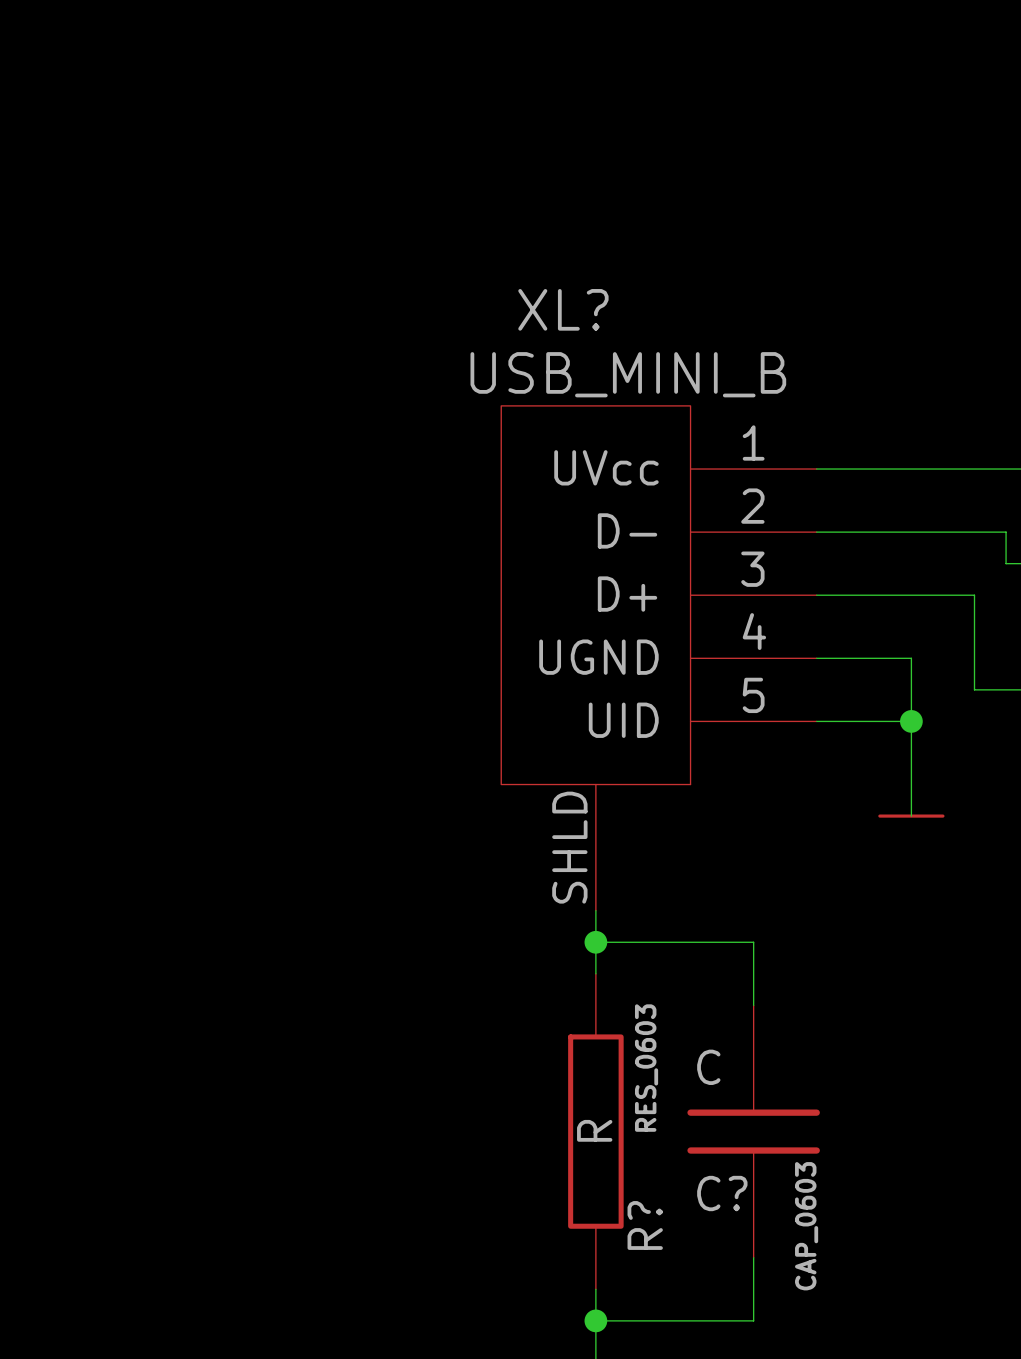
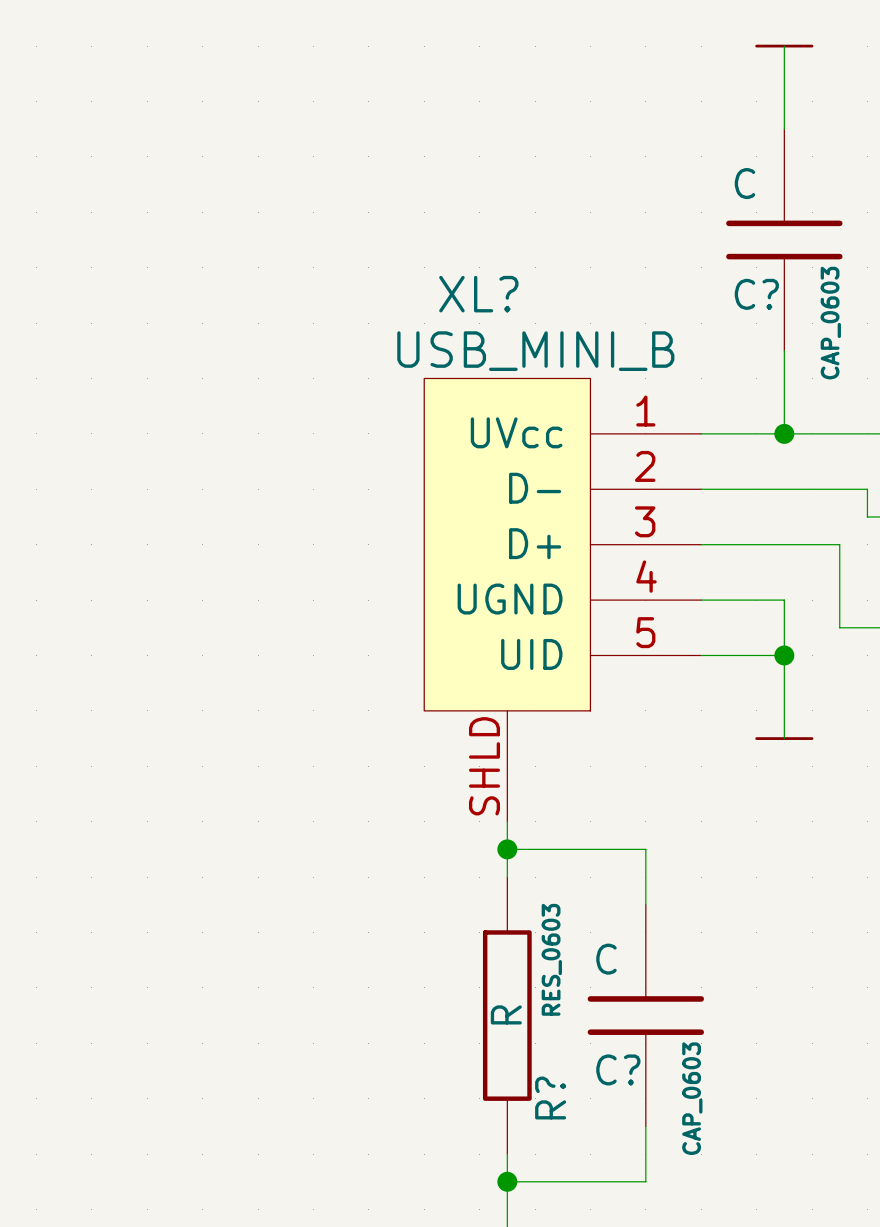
wire: none -> (784, 46) (784, 129)
power symbol: none -> (784, 46)
C?: none -> C (784, 239)
wire: none -> (784, 350) (784, 433)
junction: none -> (784, 433)

